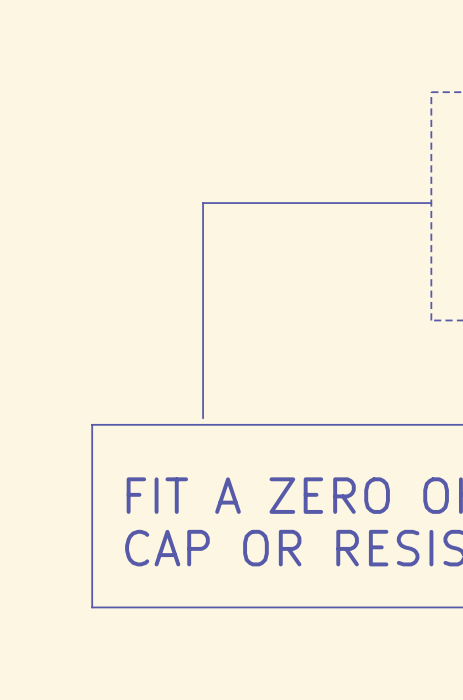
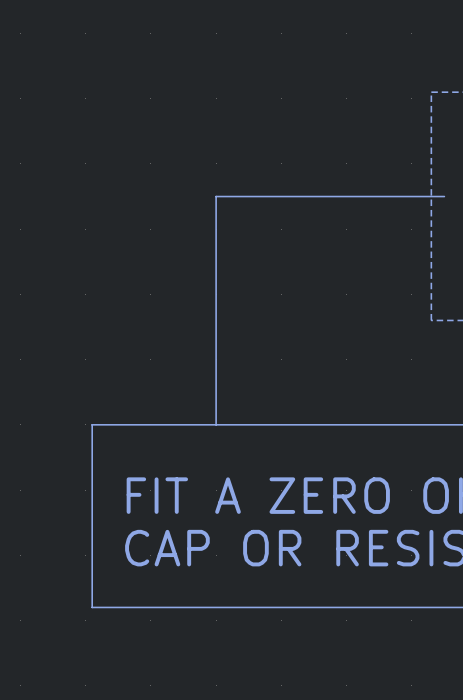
line: none -> (444, 196) (216, 196) (216, 424)
line: (431, 203) (203, 203) (203, 418) -> none

